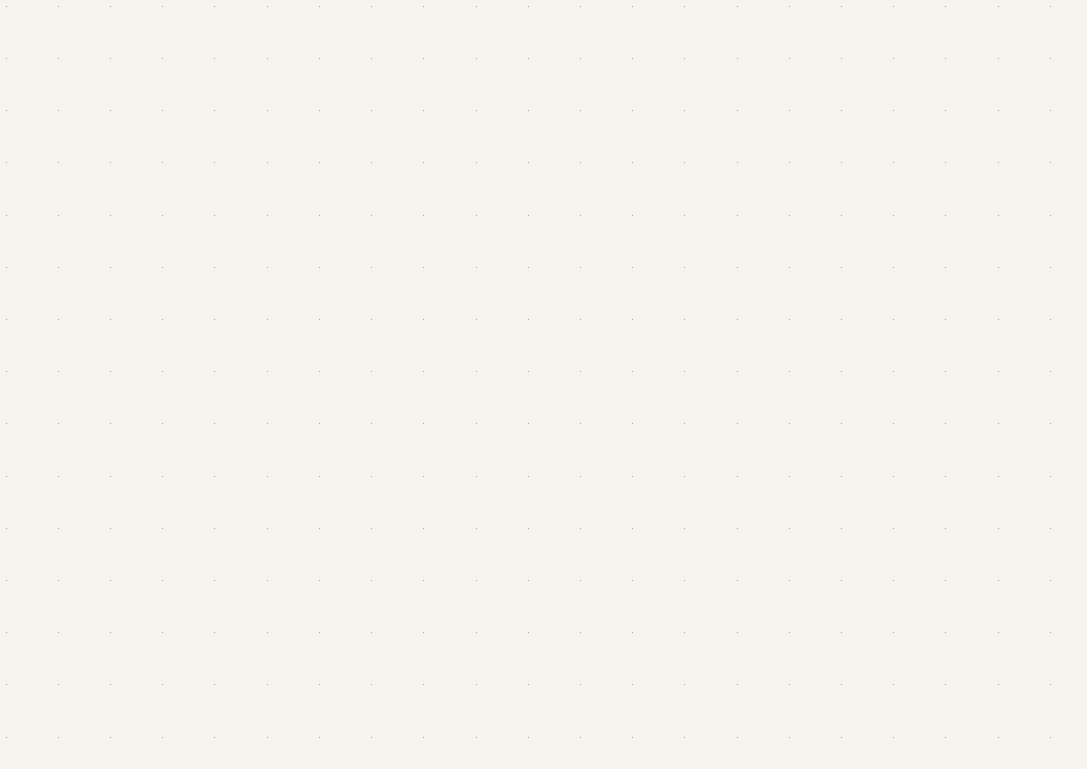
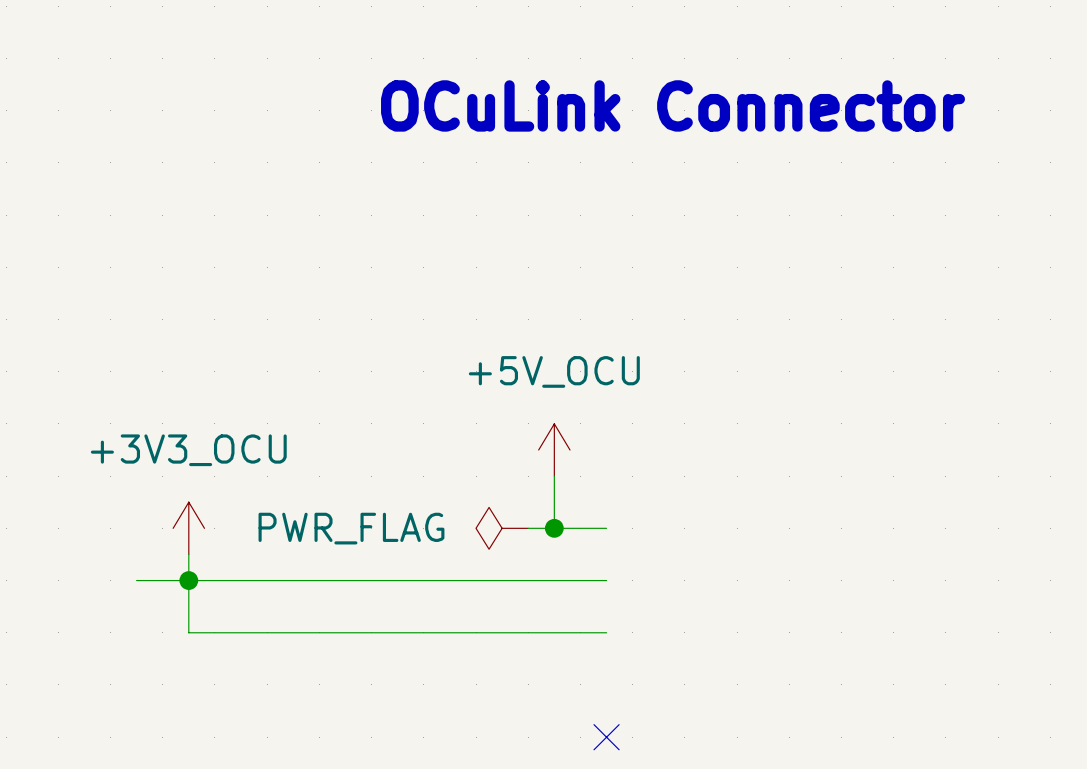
text: none -> OCuLink Connector (673, 105)
power symbol: none -> +5V_OCU (554, 450)
wire: none -> (554, 476) (554, 528)
power symbol: none -> +3V3_OCU (188, 528)
power symbol: none -> PWR_FLAG (502, 528)
wire: none -> (528, 528) (606, 528)
junction: none -> (554, 528)
wire: none -> (188, 554) (188, 632) (606, 632)
wire: none -> (136, 580) (606, 580)
junction: none -> (188, 580)
no-connect mark: none -> (606, 737)

